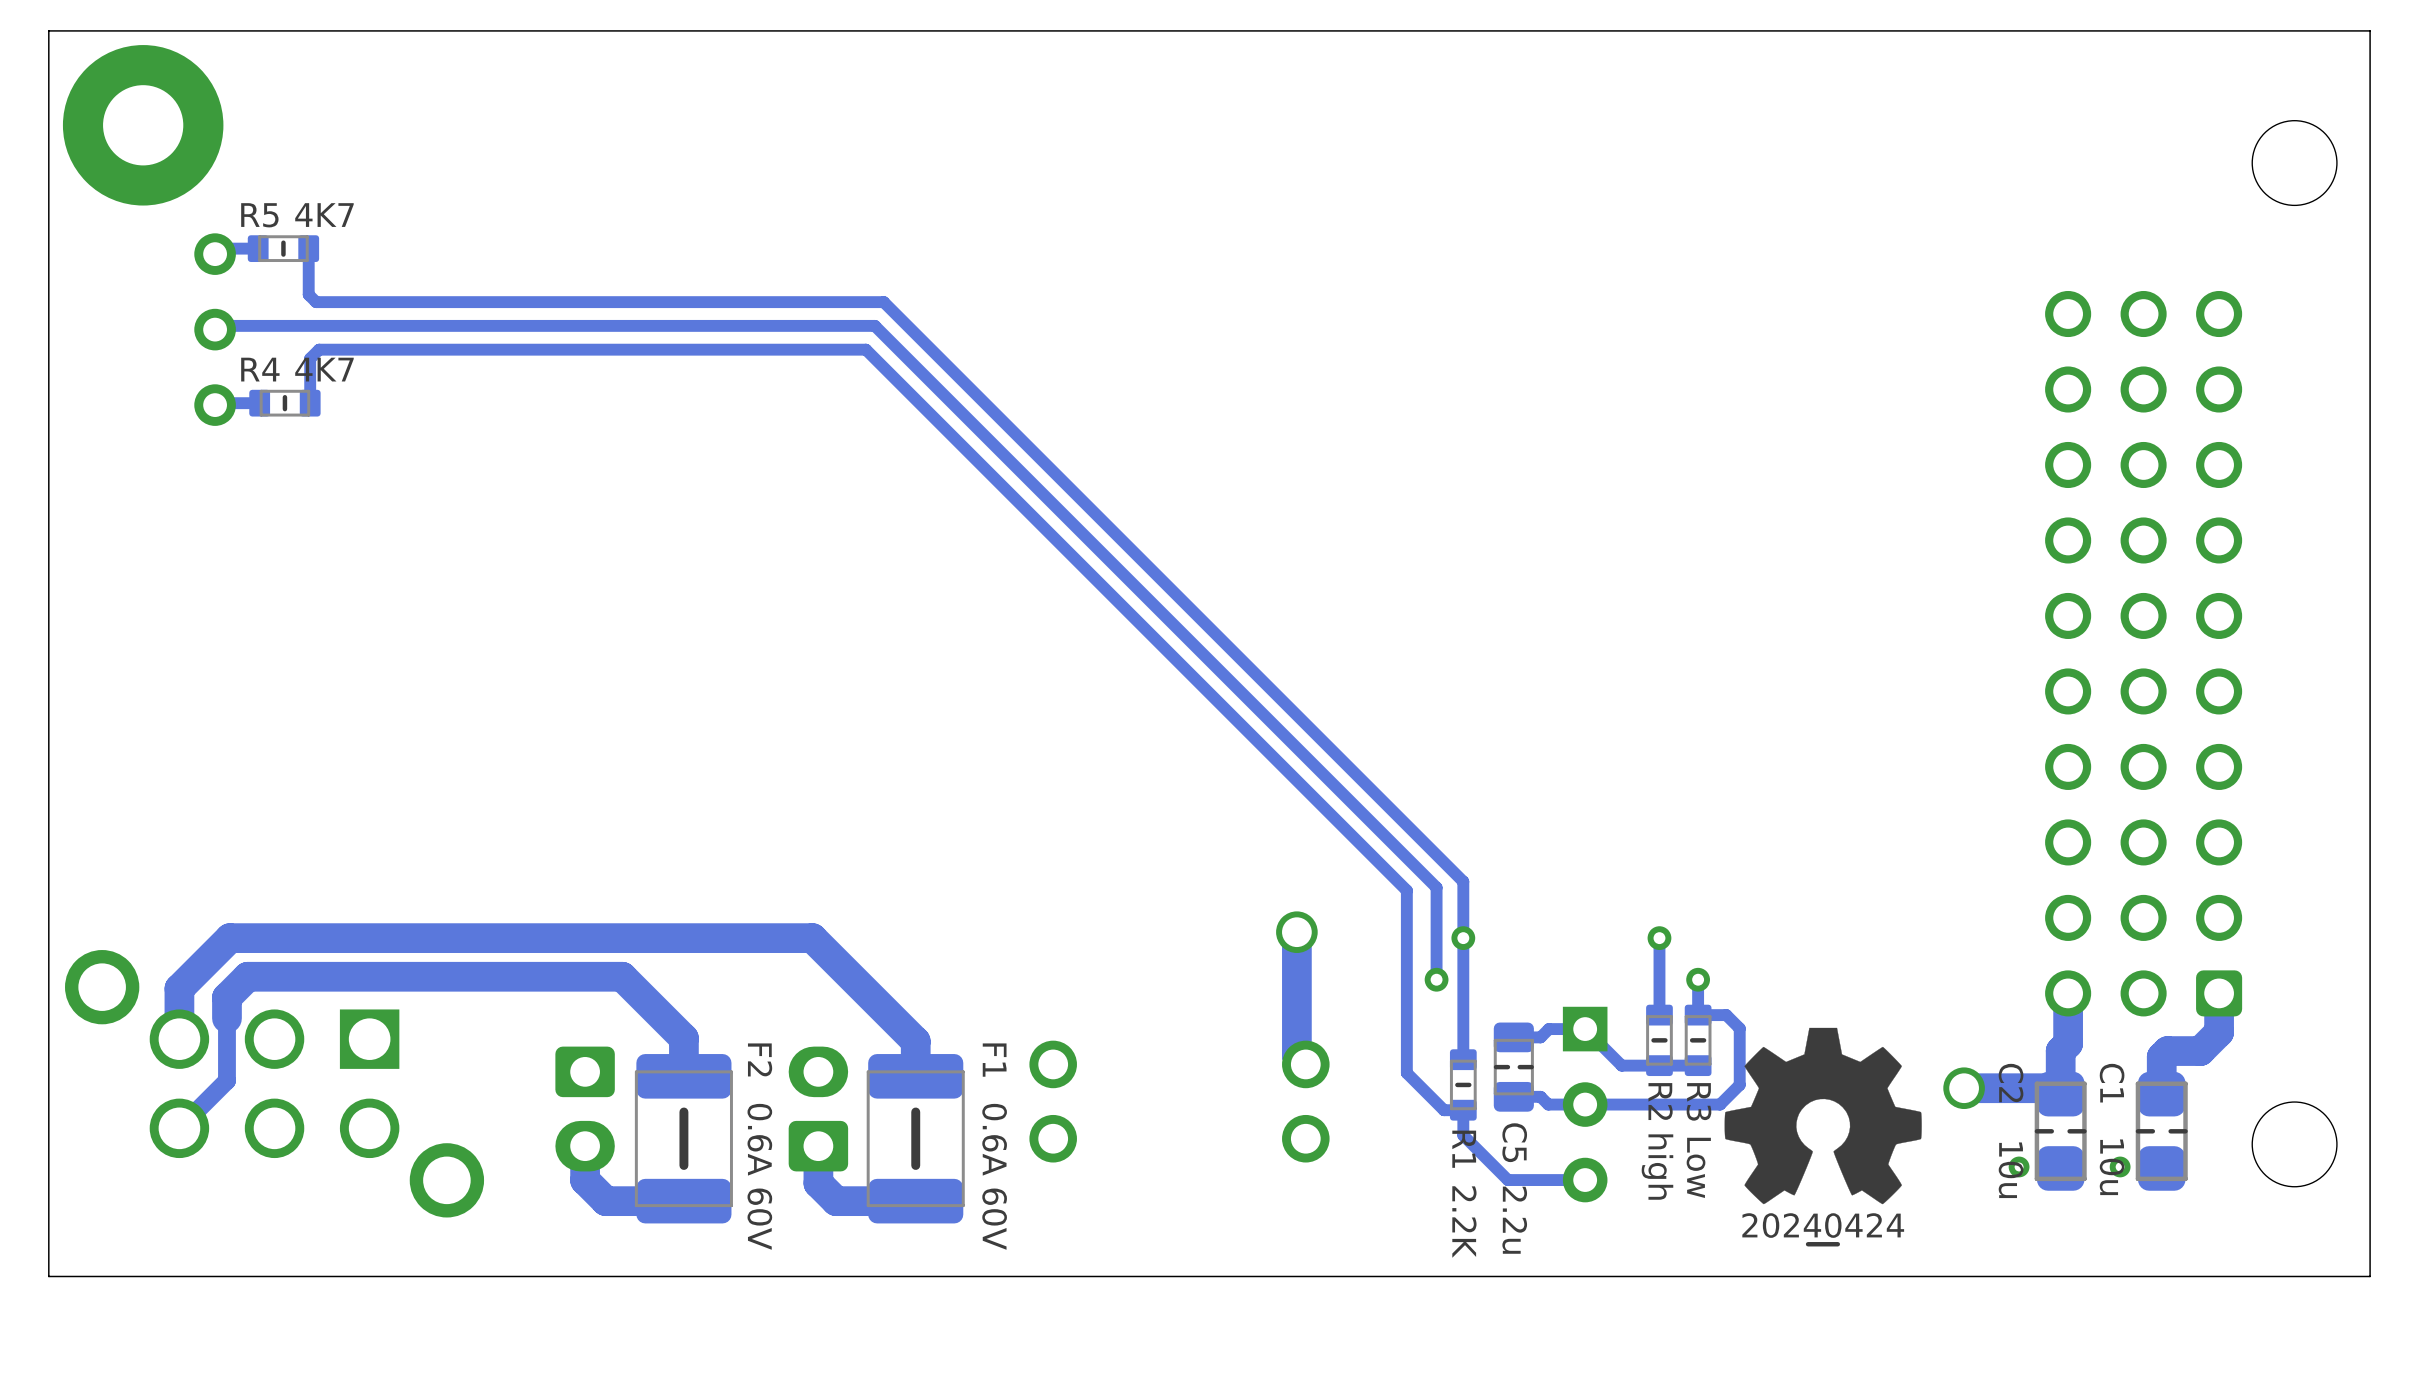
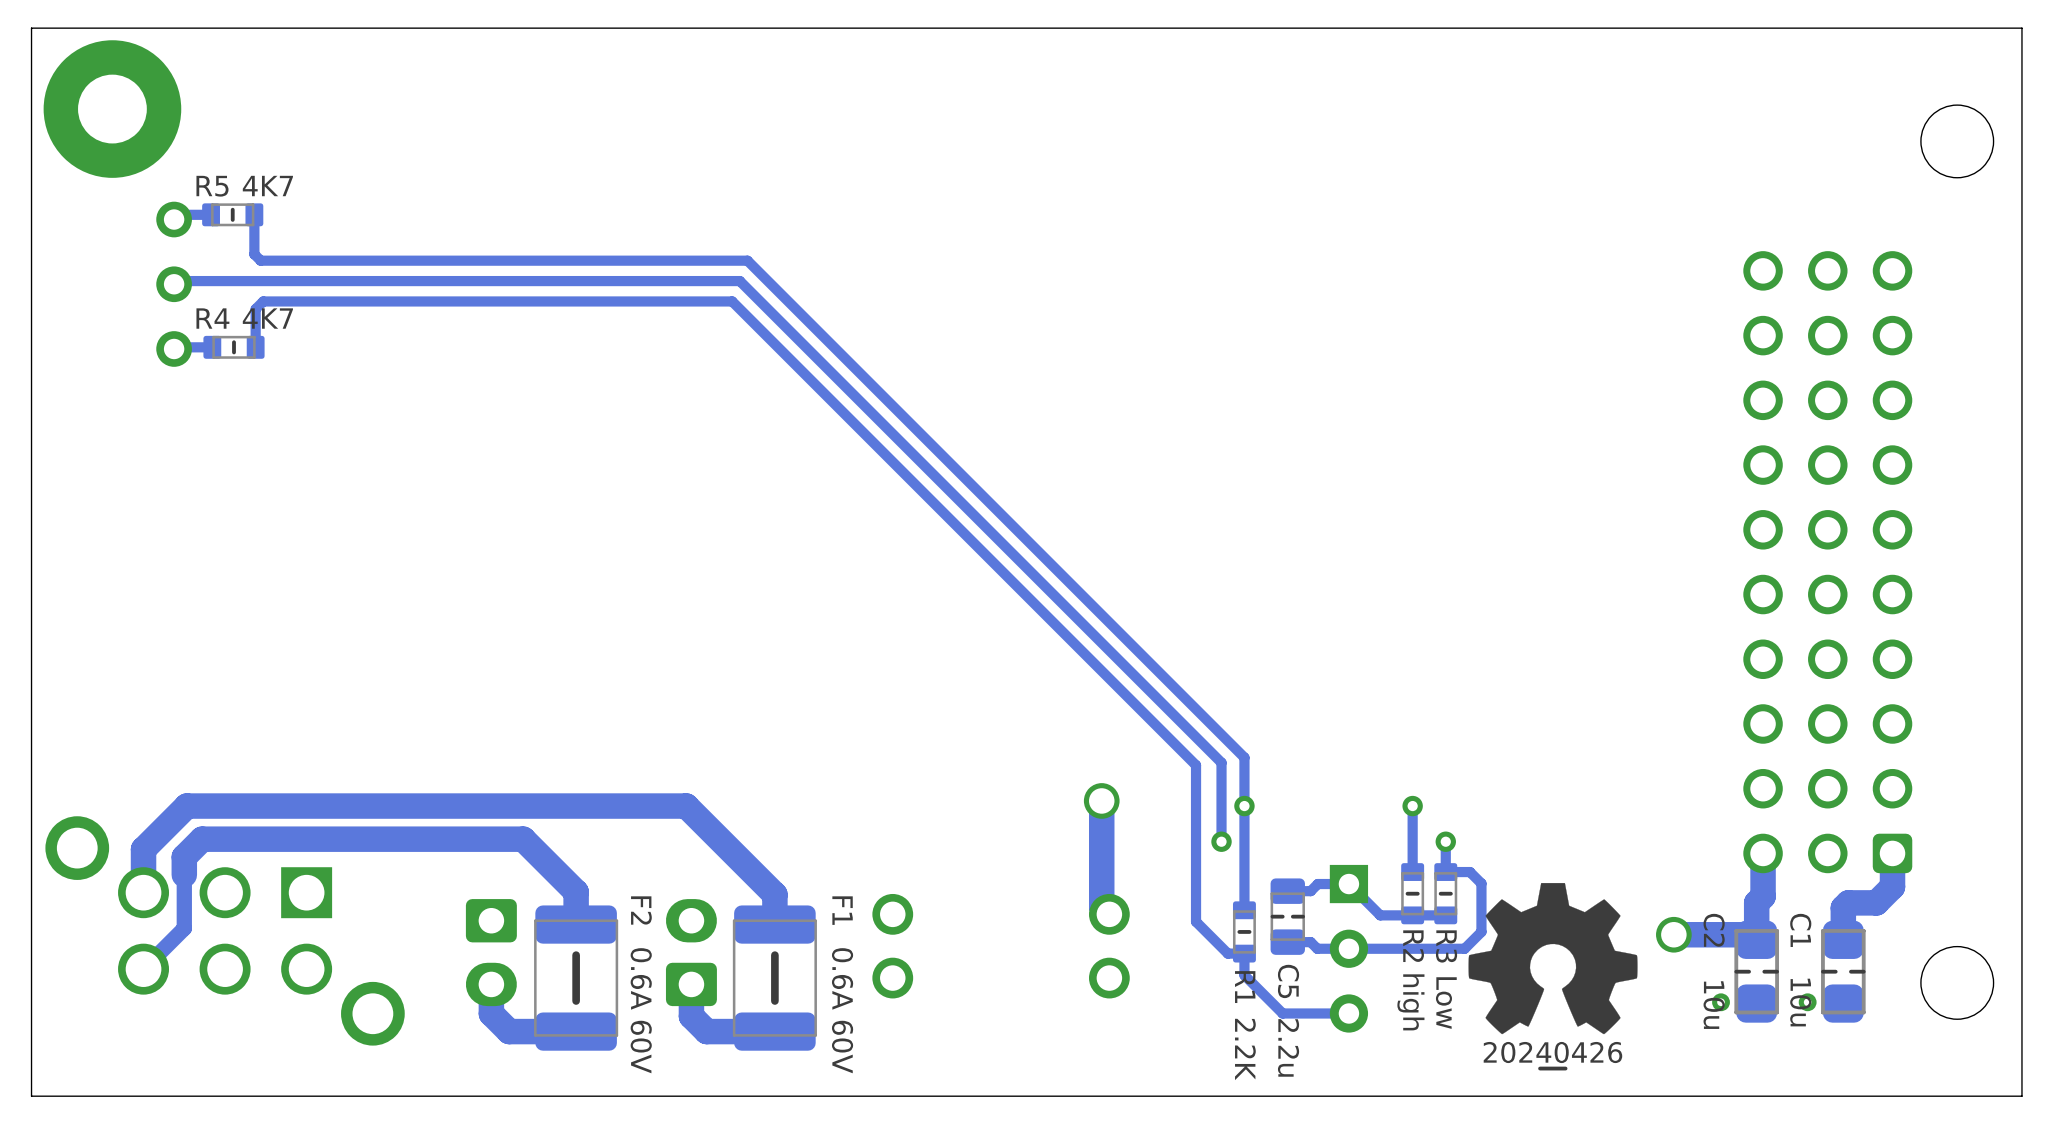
drawing shape: [1742, 1213, 1905, 1247] -> [1483, 1041, 1623, 1071]

